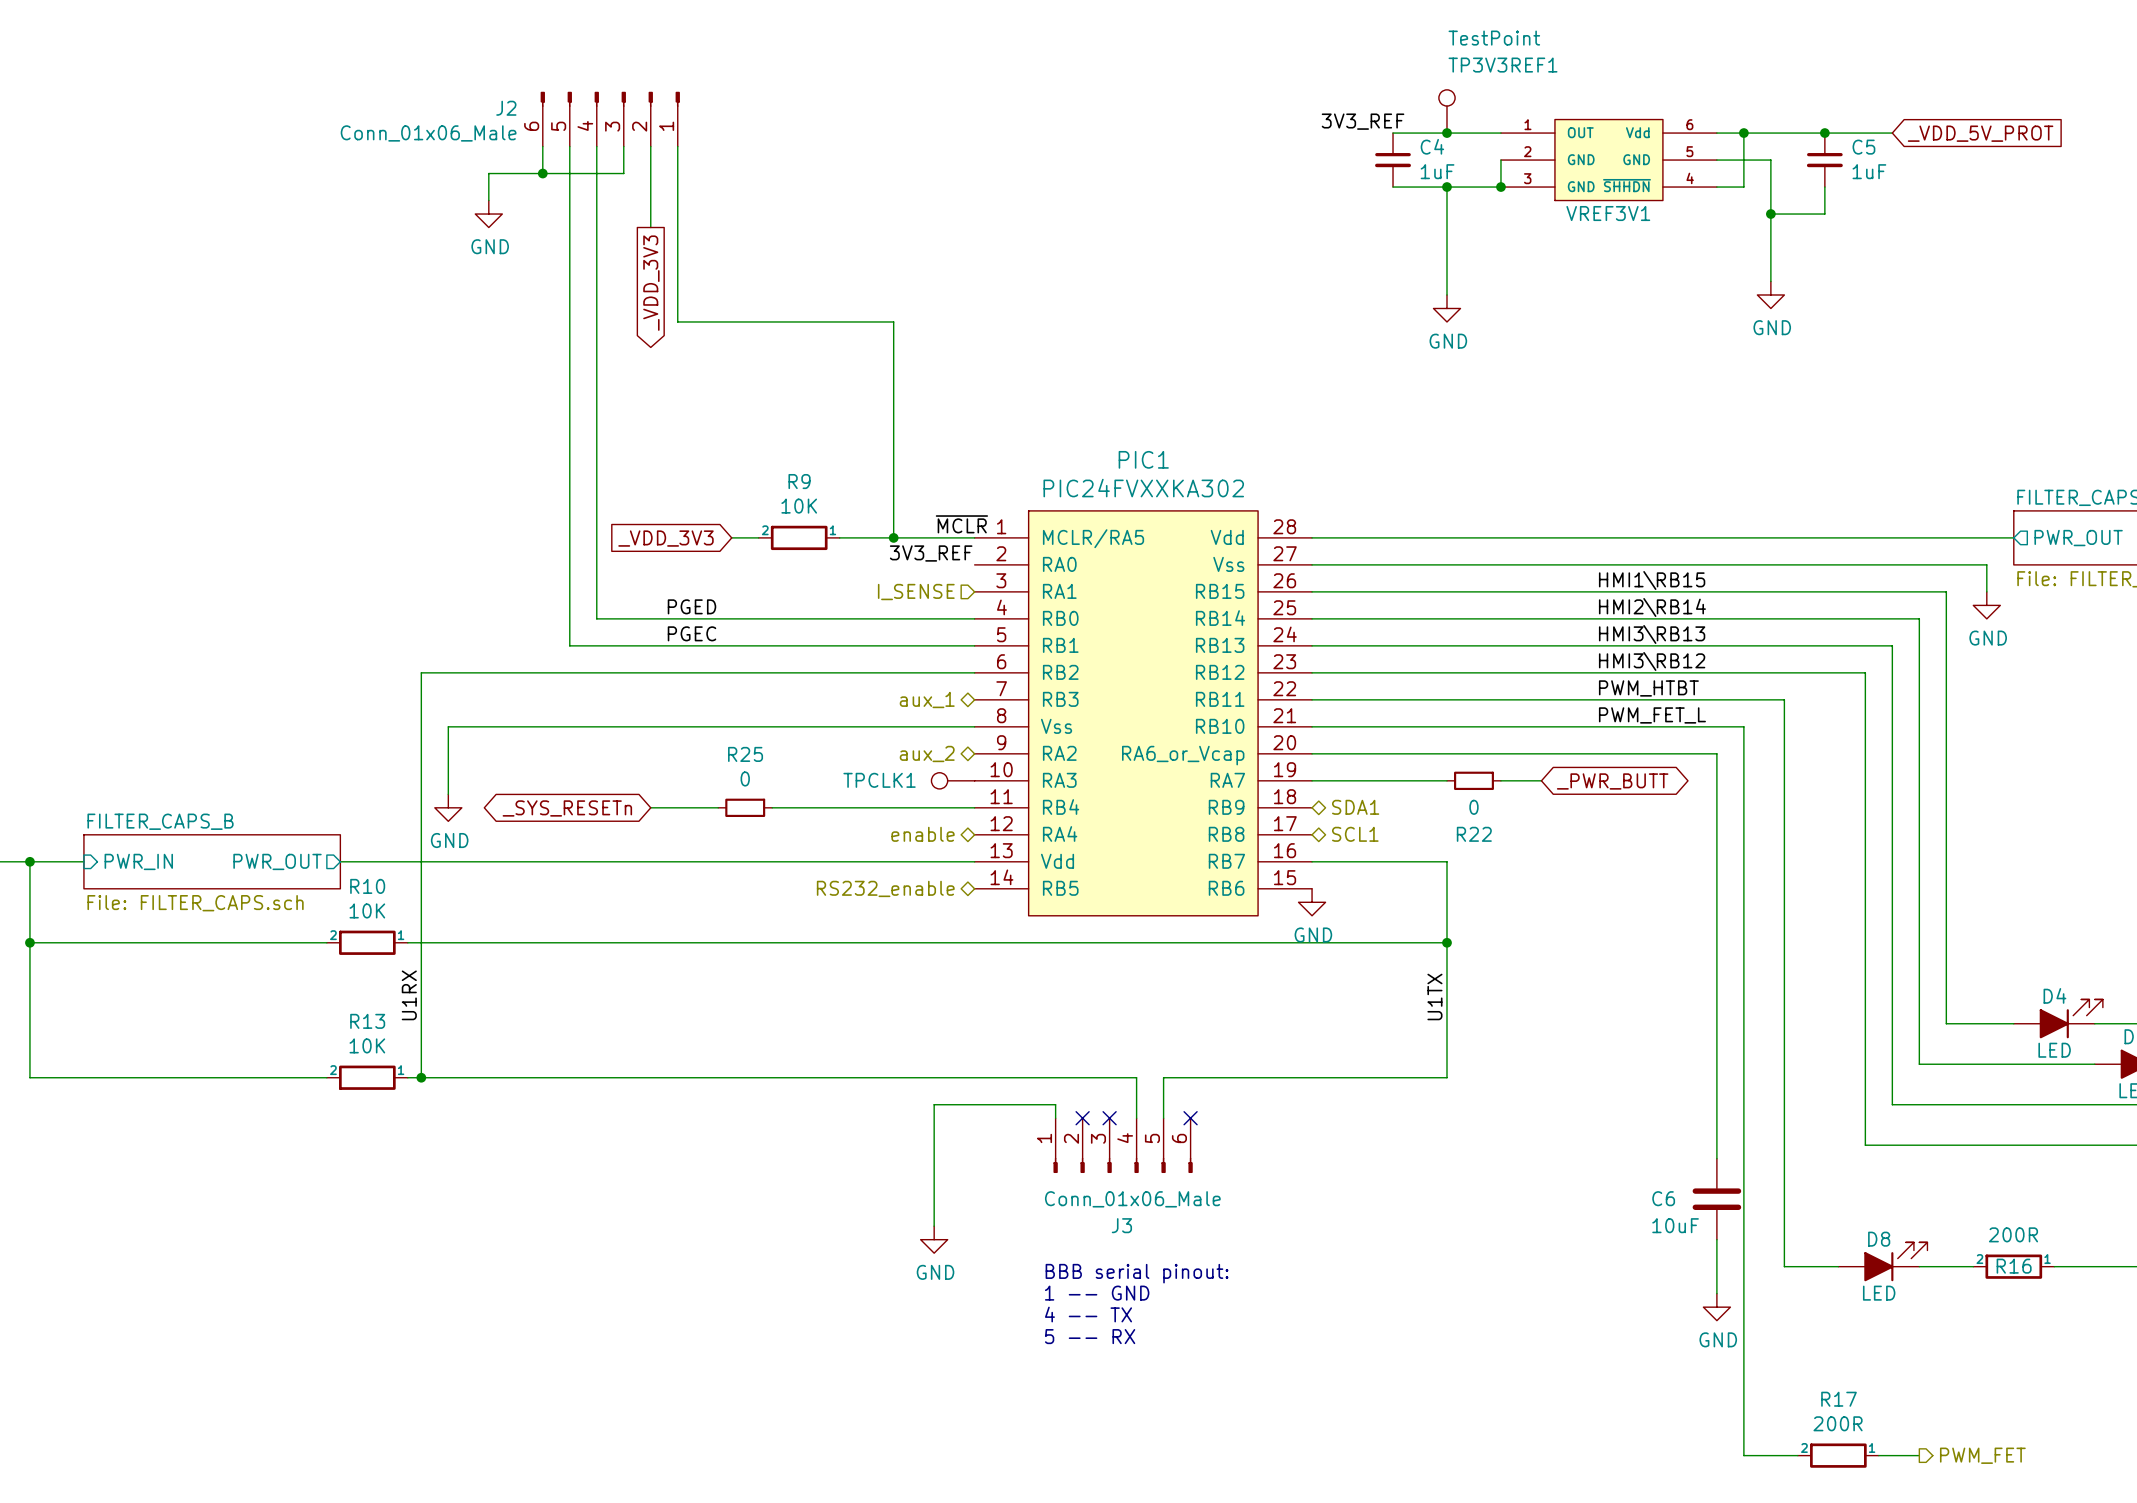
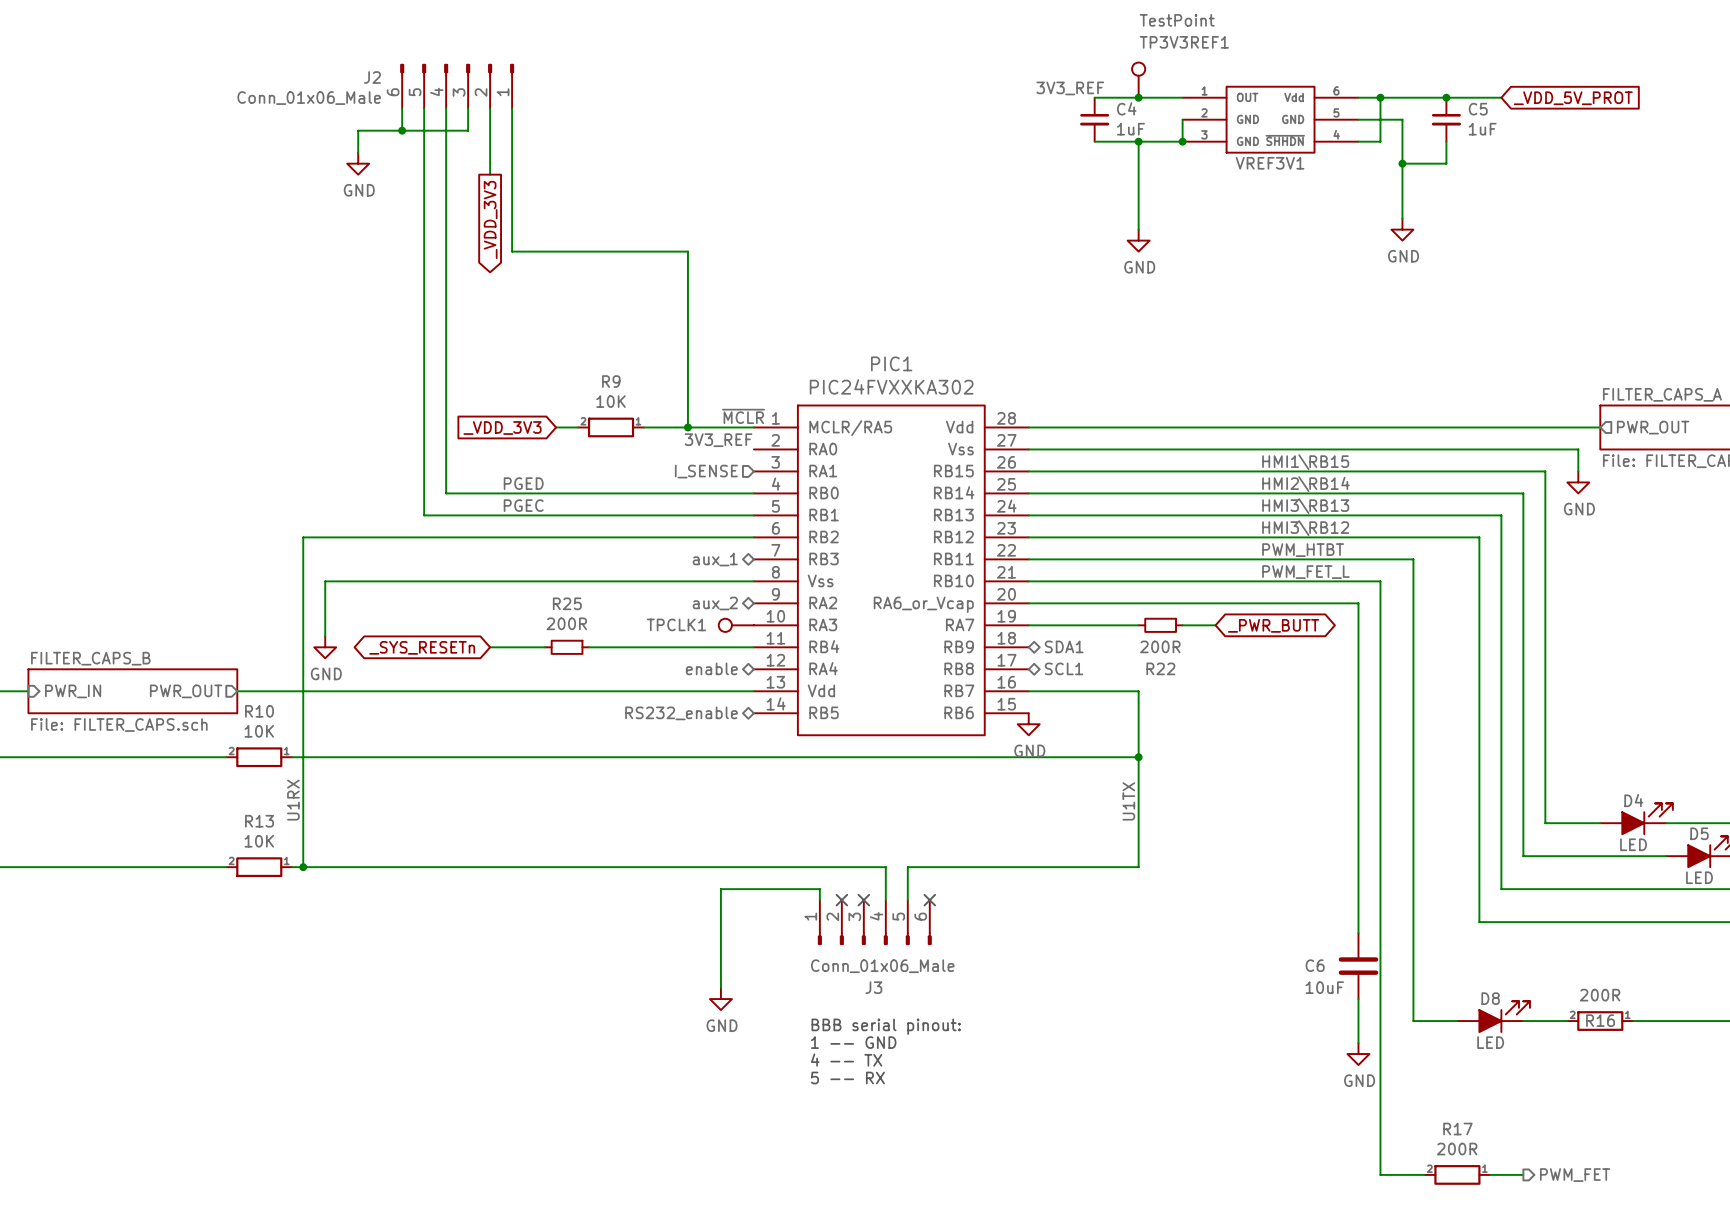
R25 value: 0 (745, 778) -> 200R (566, 623)
R22 value: 0 (1473, 807) -> 200R (1160, 646)

